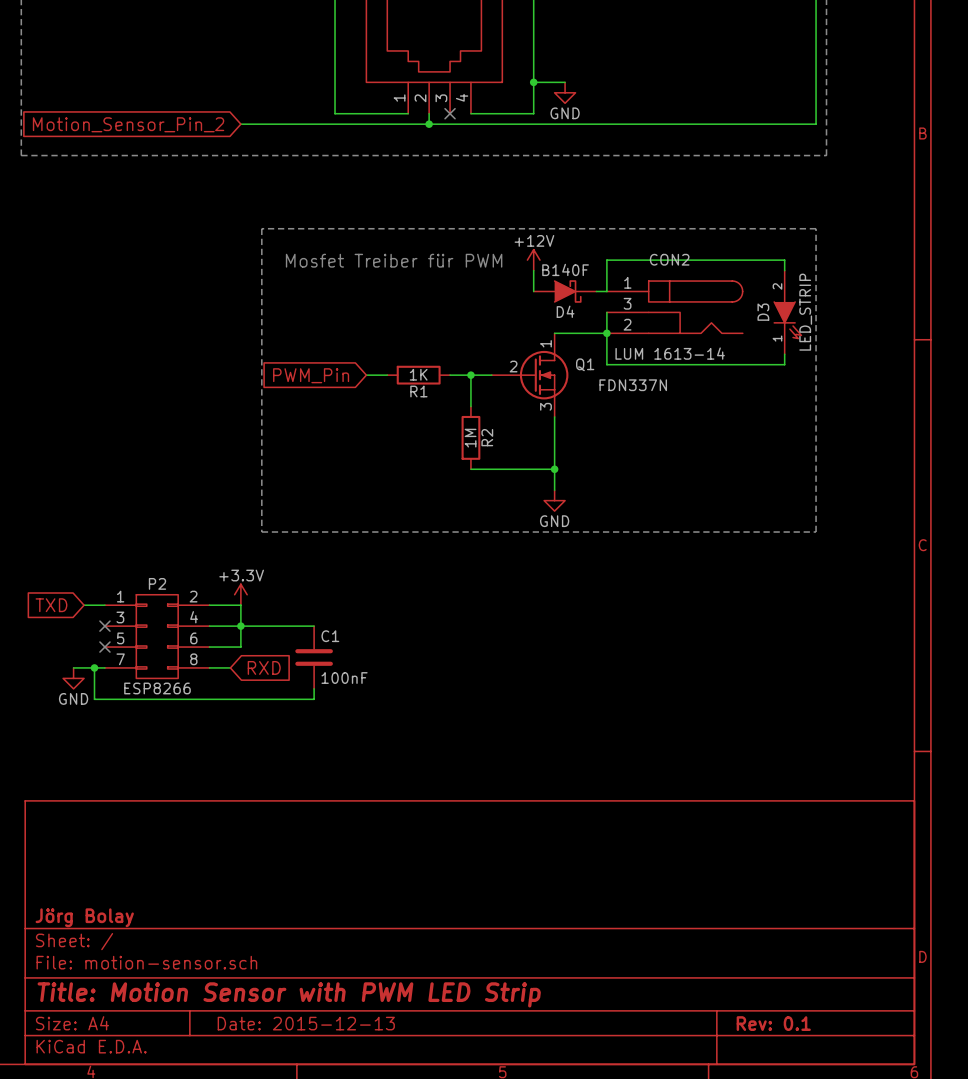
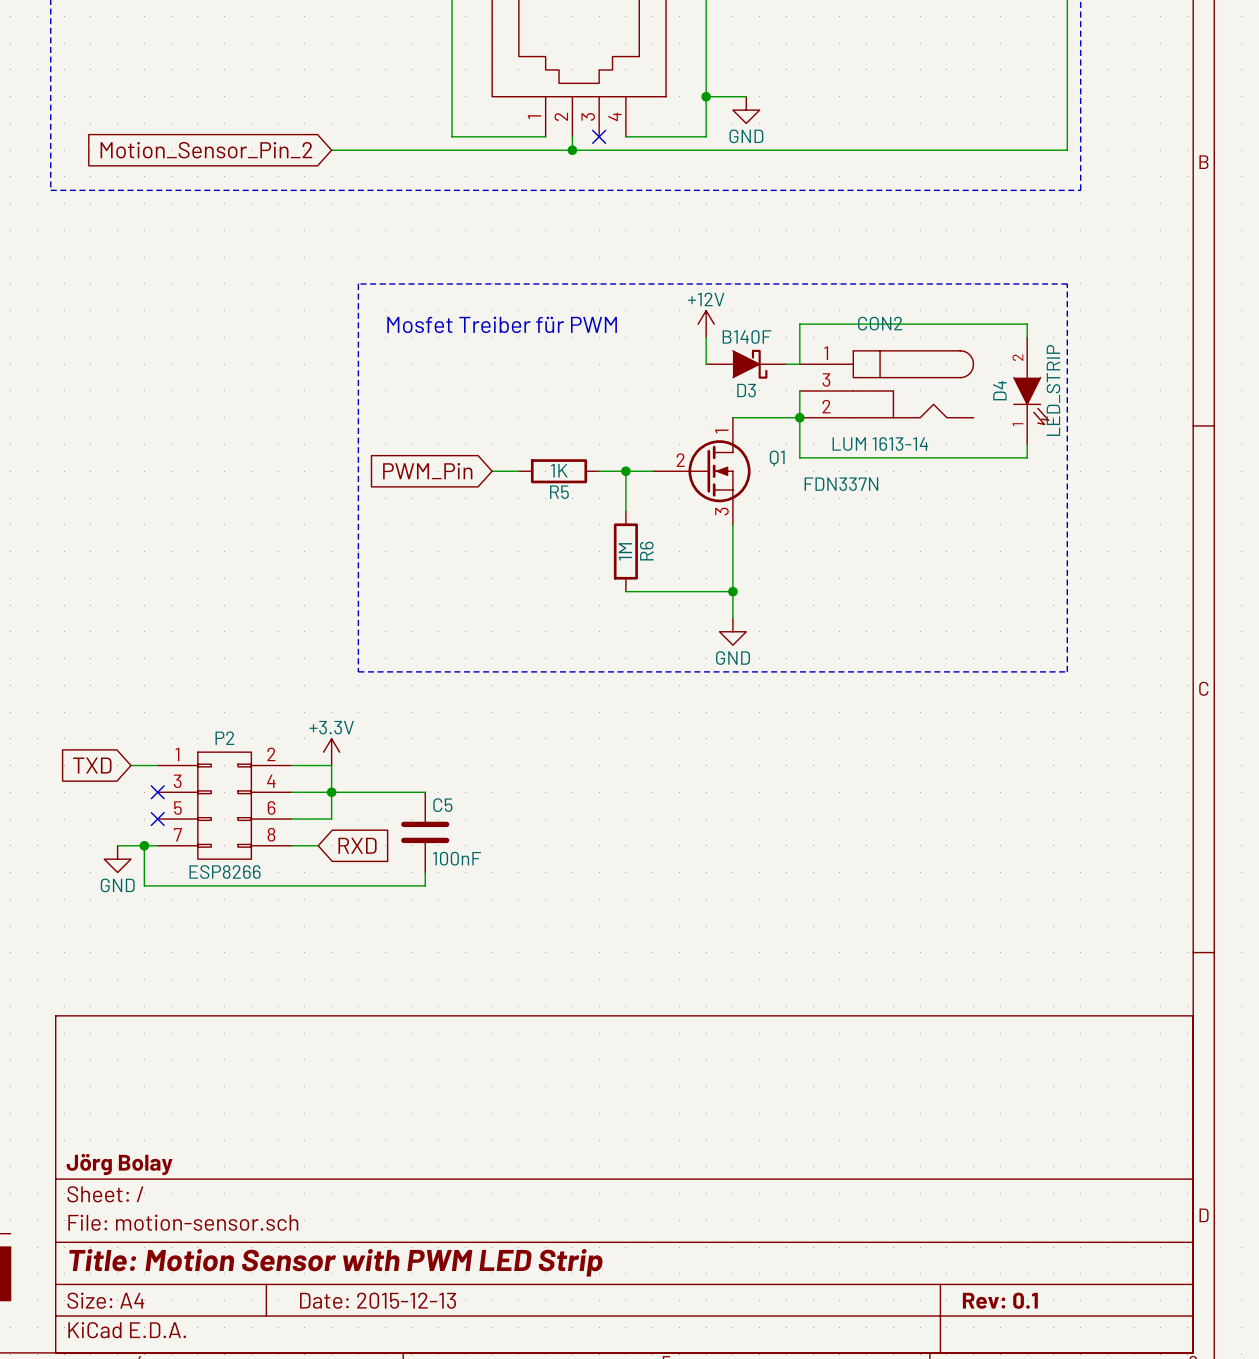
D4 name: D4 (565, 311) -> D3 (746, 390)
D3 name: D3 (763, 312) -> D4 (999, 390)
R1 name: R1 (418, 391) -> R5 (559, 492)
R2 name: R2 (487, 437) -> R6 (646, 551)
C1 name: C1 (330, 636) -> C5 (442, 805)

